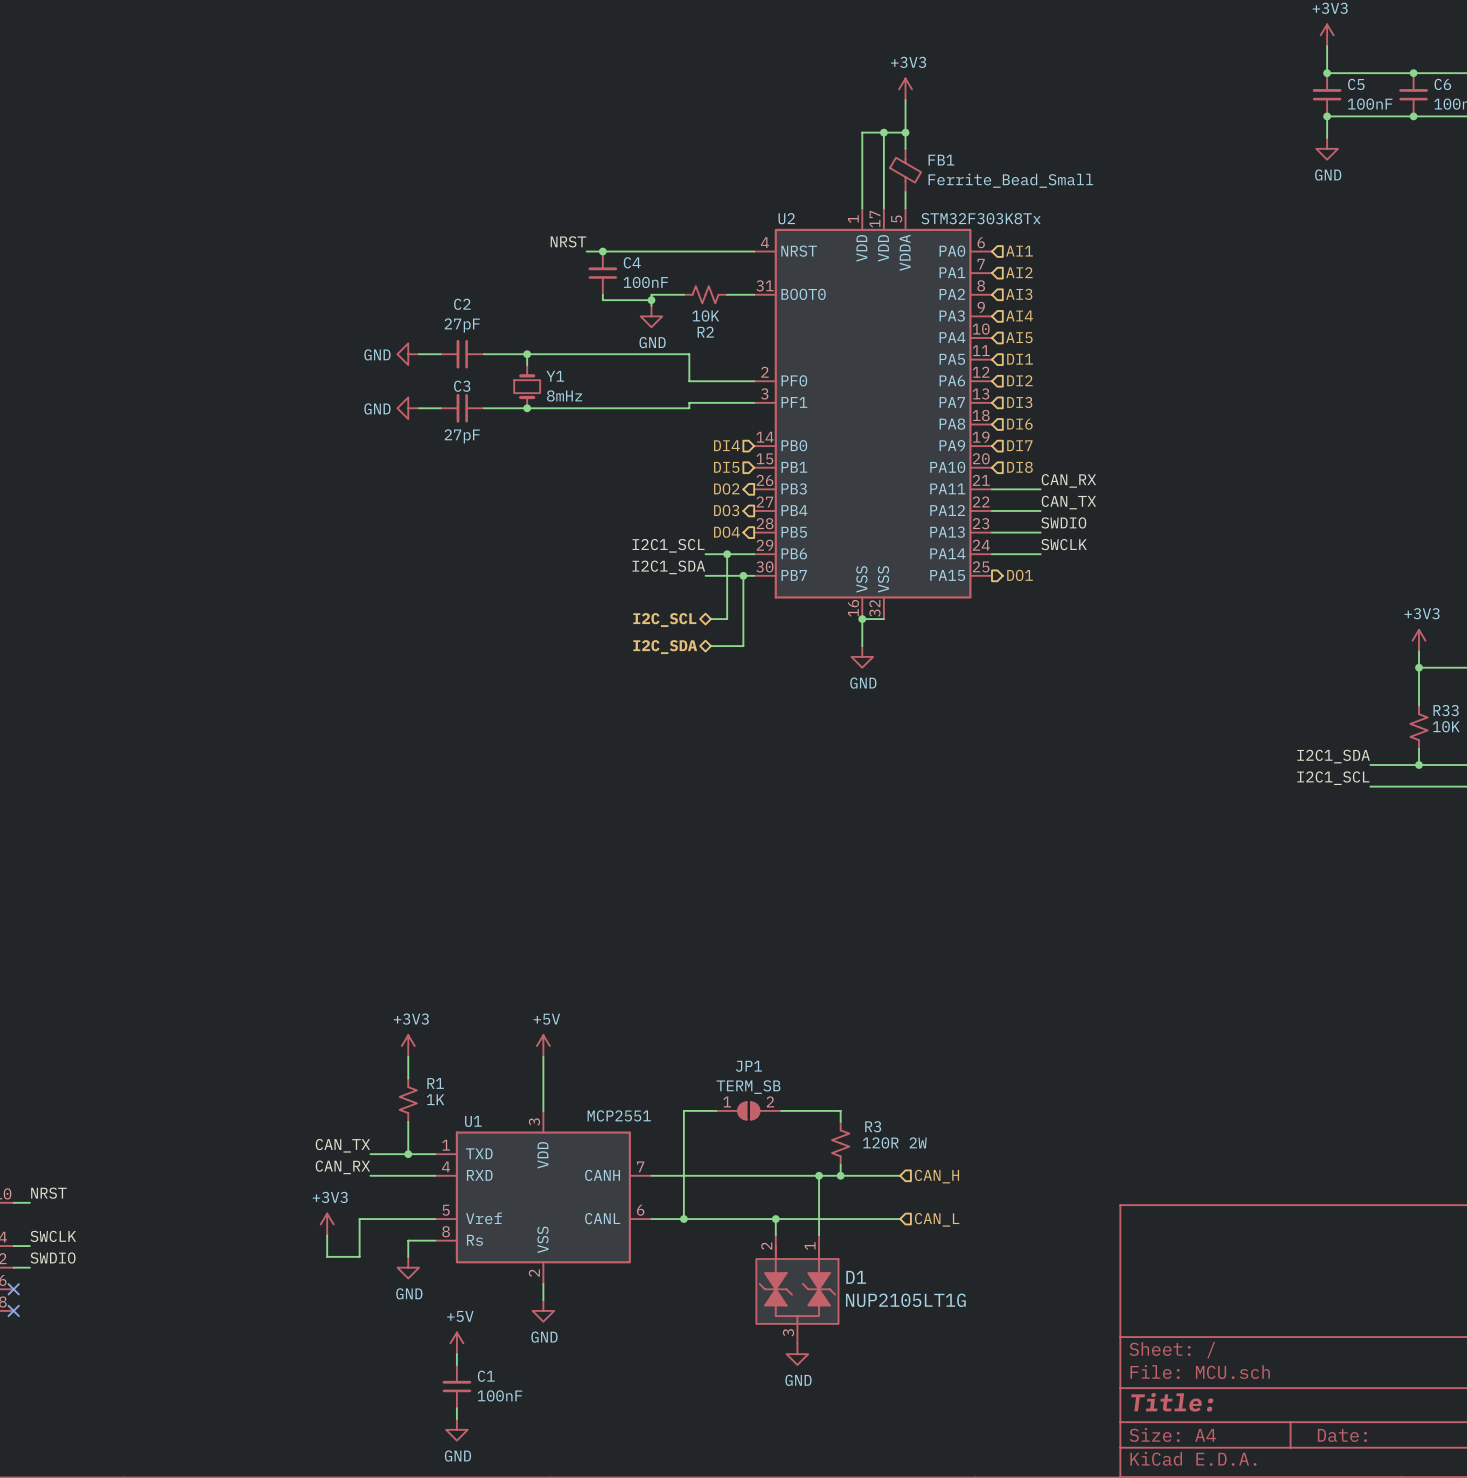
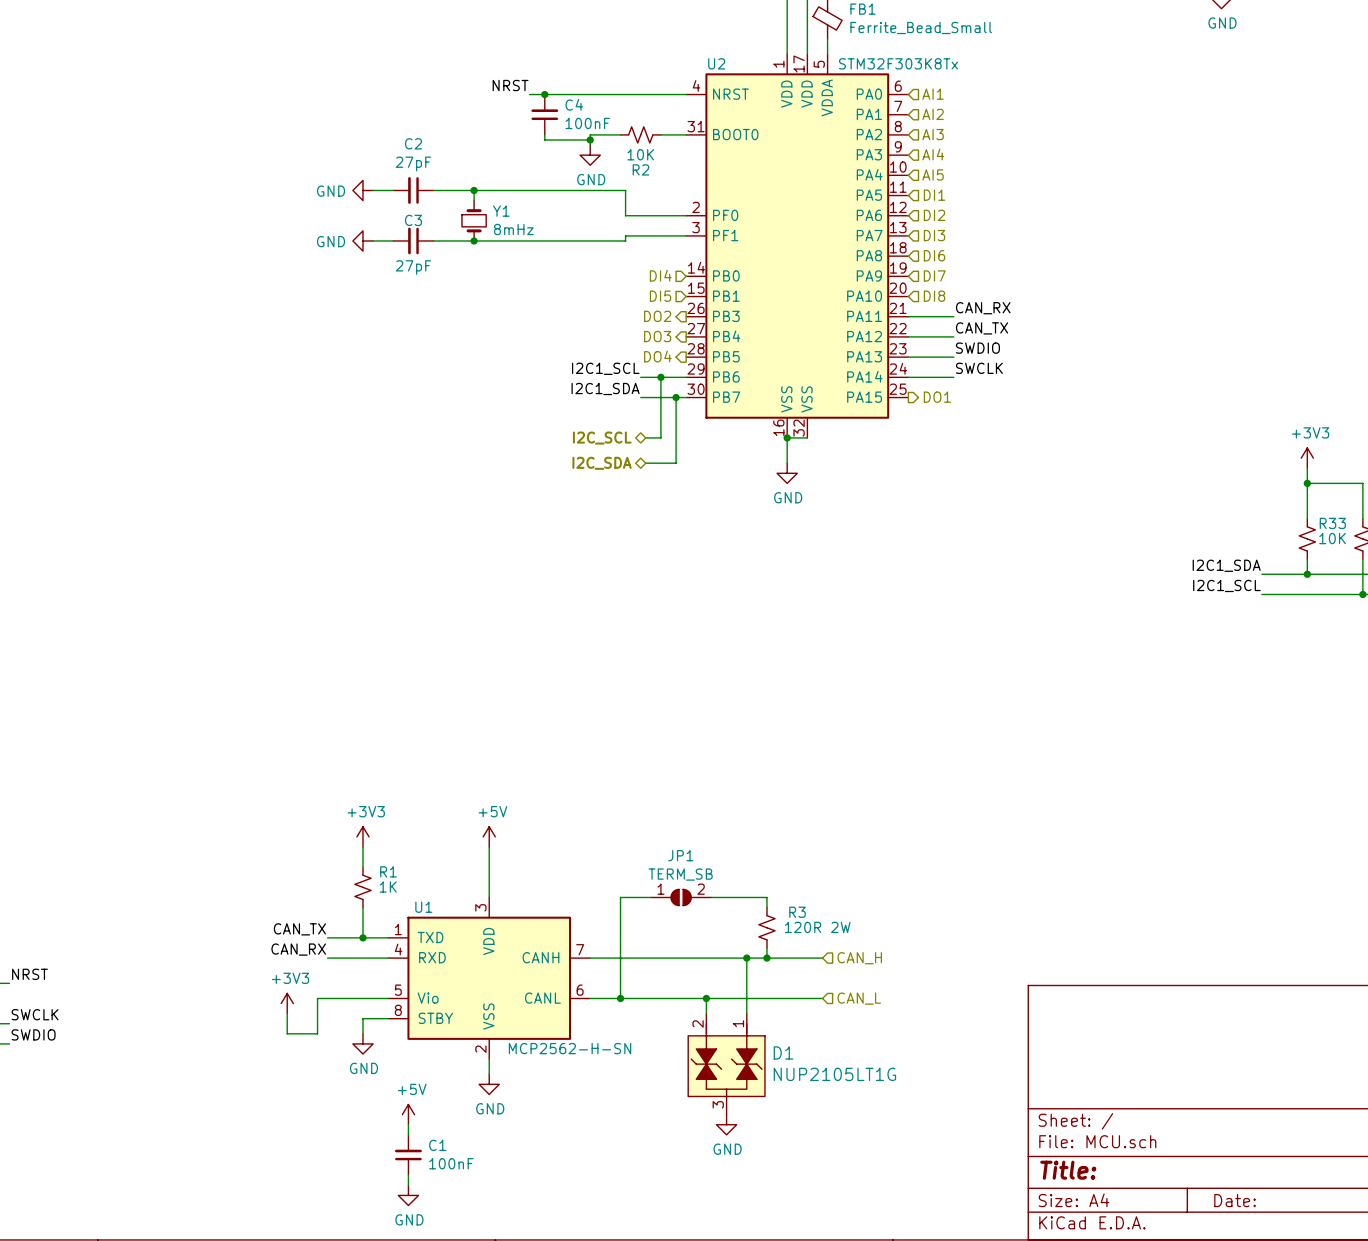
U1 value: MCP2551 (619, 1115) -> MCP2562-H-SN (570, 1048)
U1 pin name: Vref (483, 1218) -> Vio (428, 998)
U1 pin name: Rs (474, 1240) -> STBY (435, 1018)

